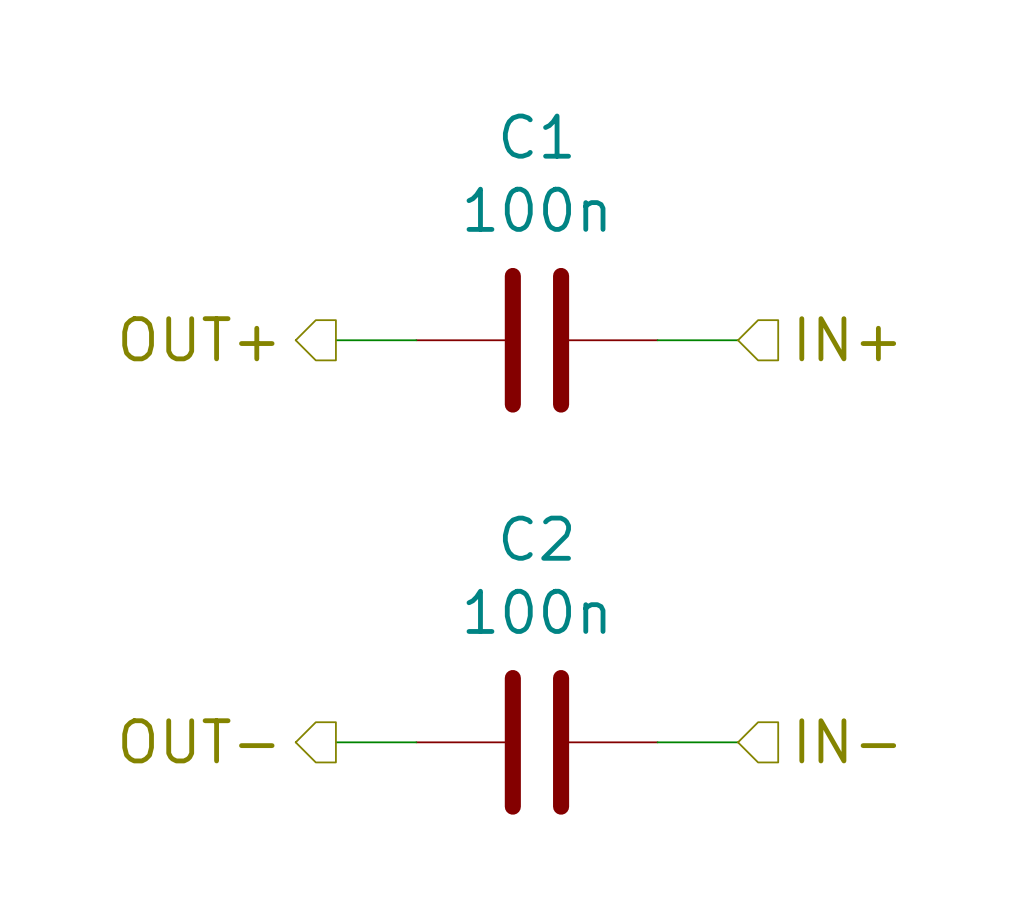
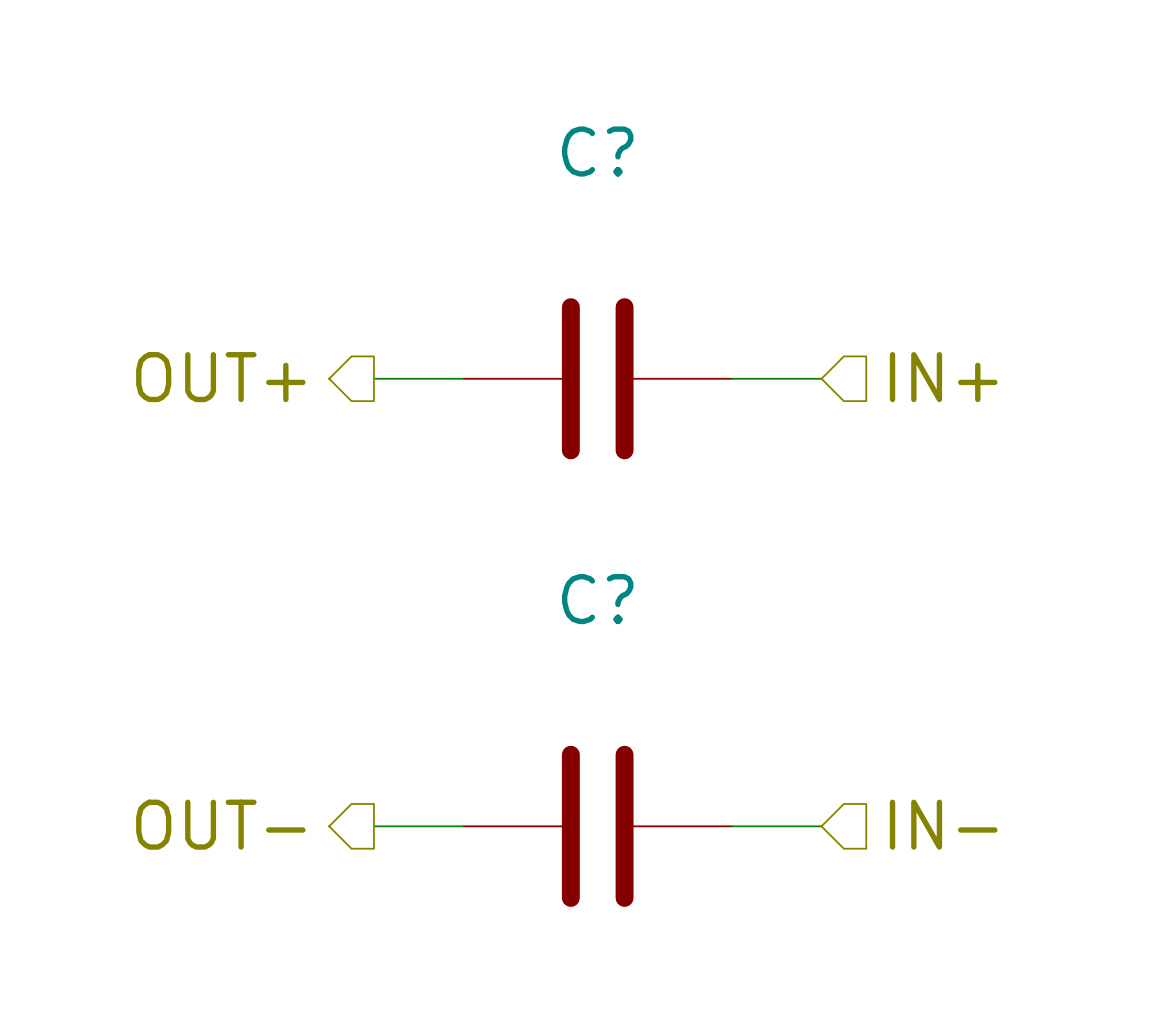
C1 name: C1 (536, 136) -> C? (597, 151)
C1 value: 100n (536, 209) -> none
C2 name: C2 (536, 538) -> C? (597, 599)
C2 value: 100n (536, 611) -> none

